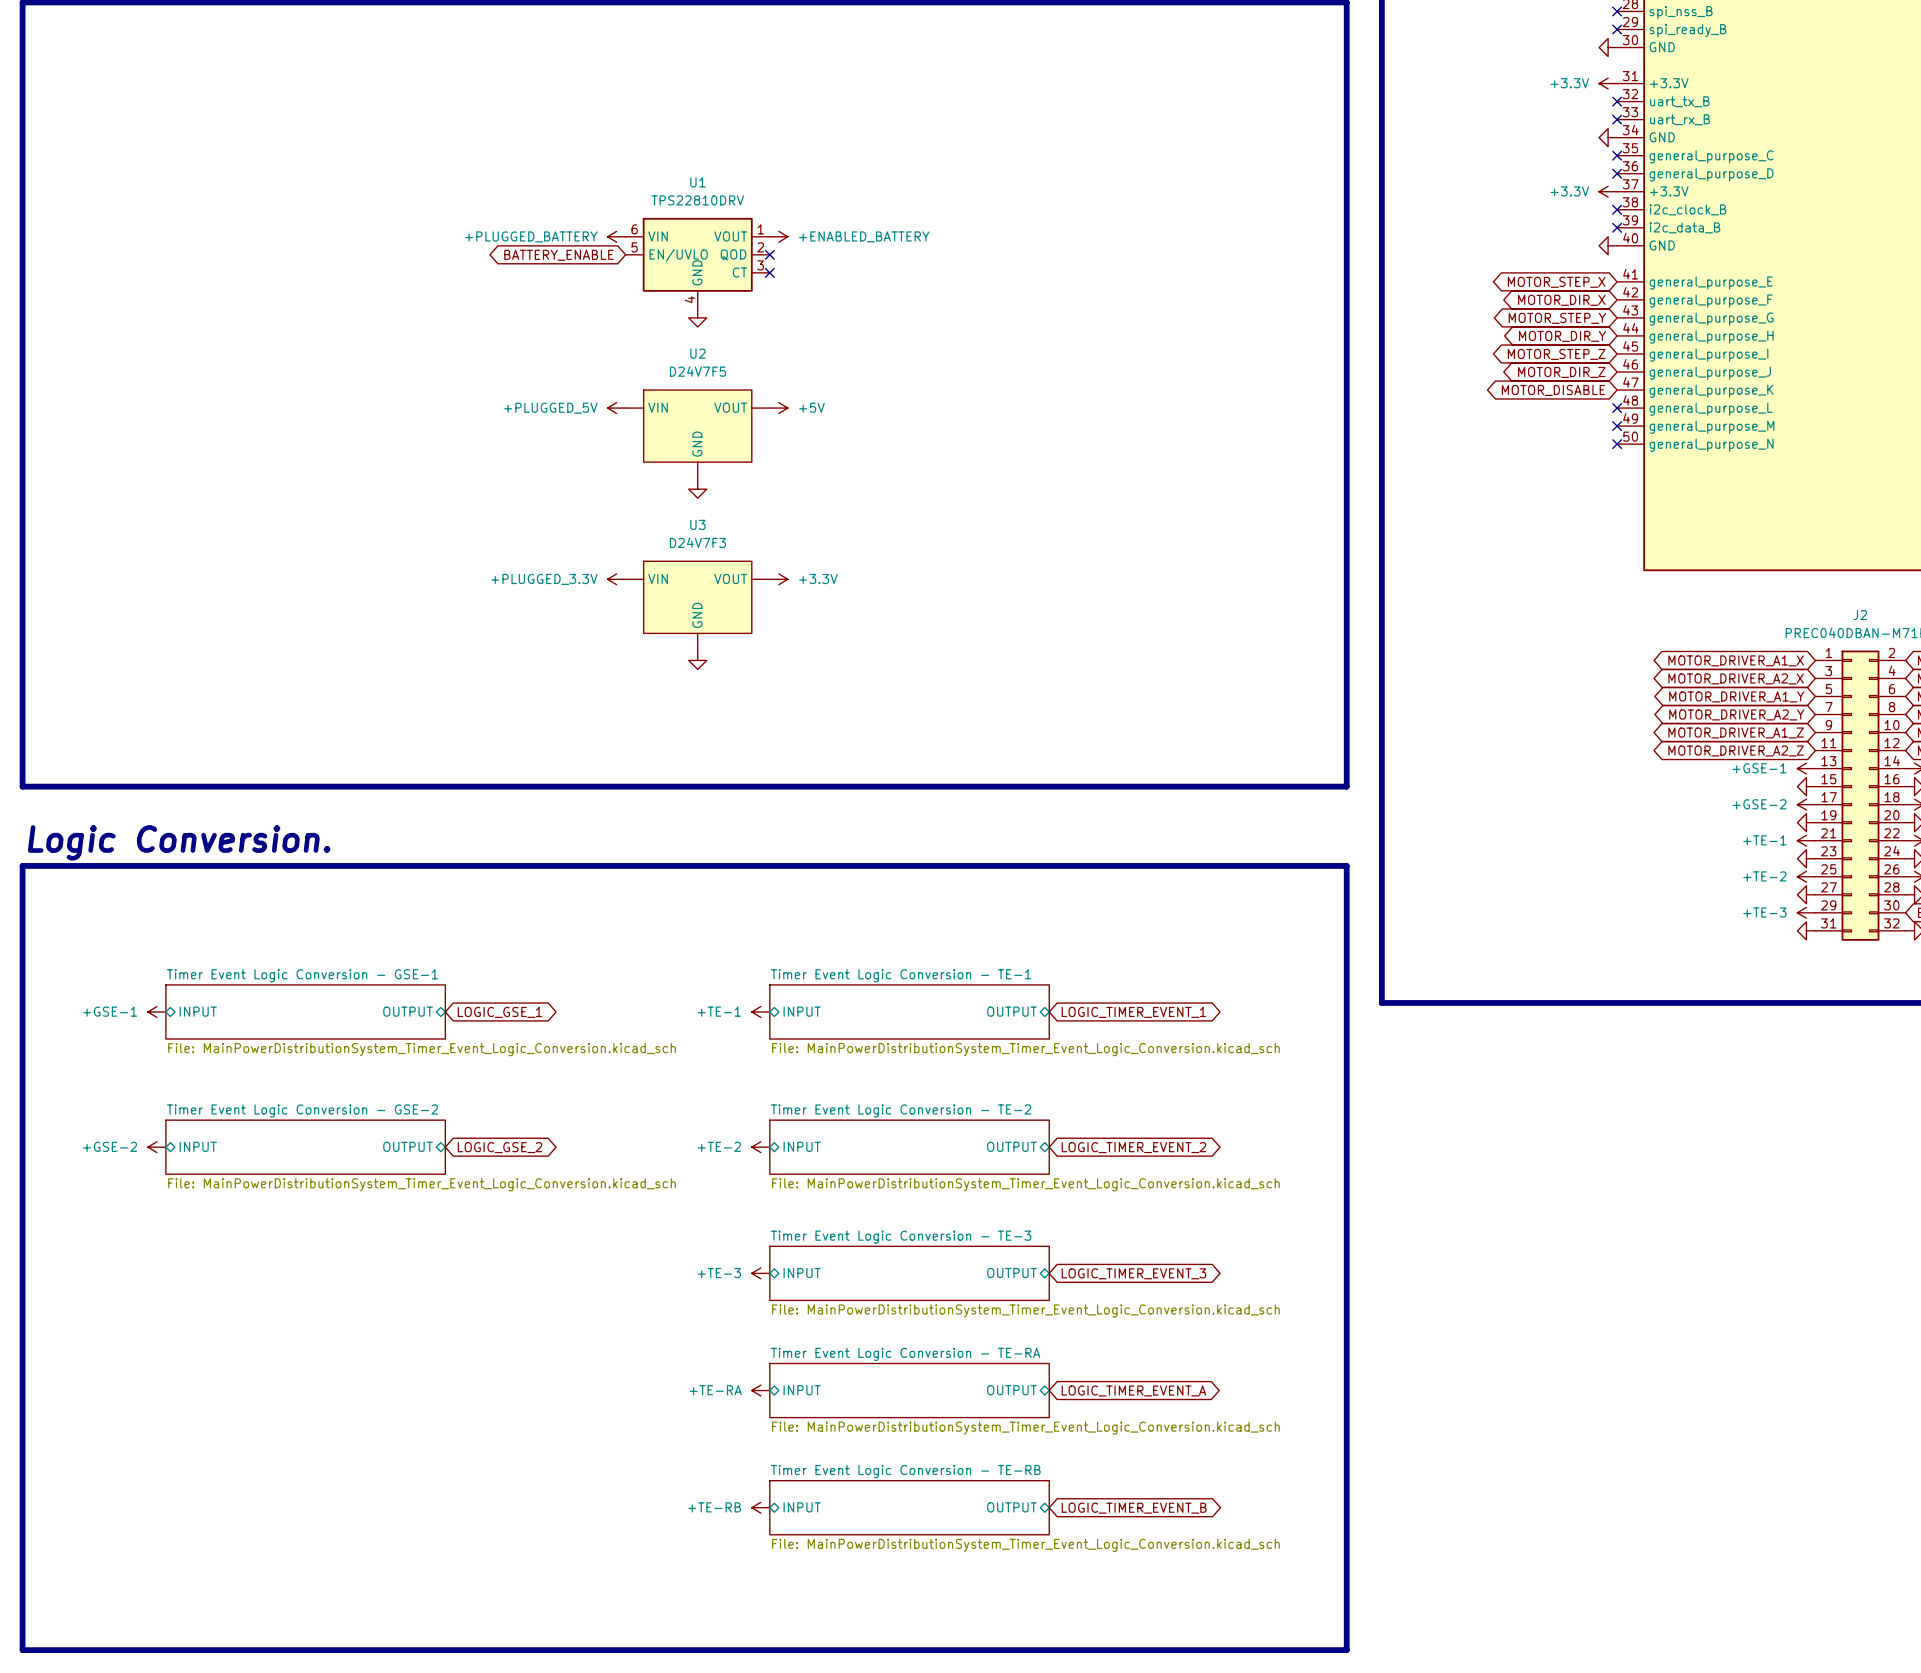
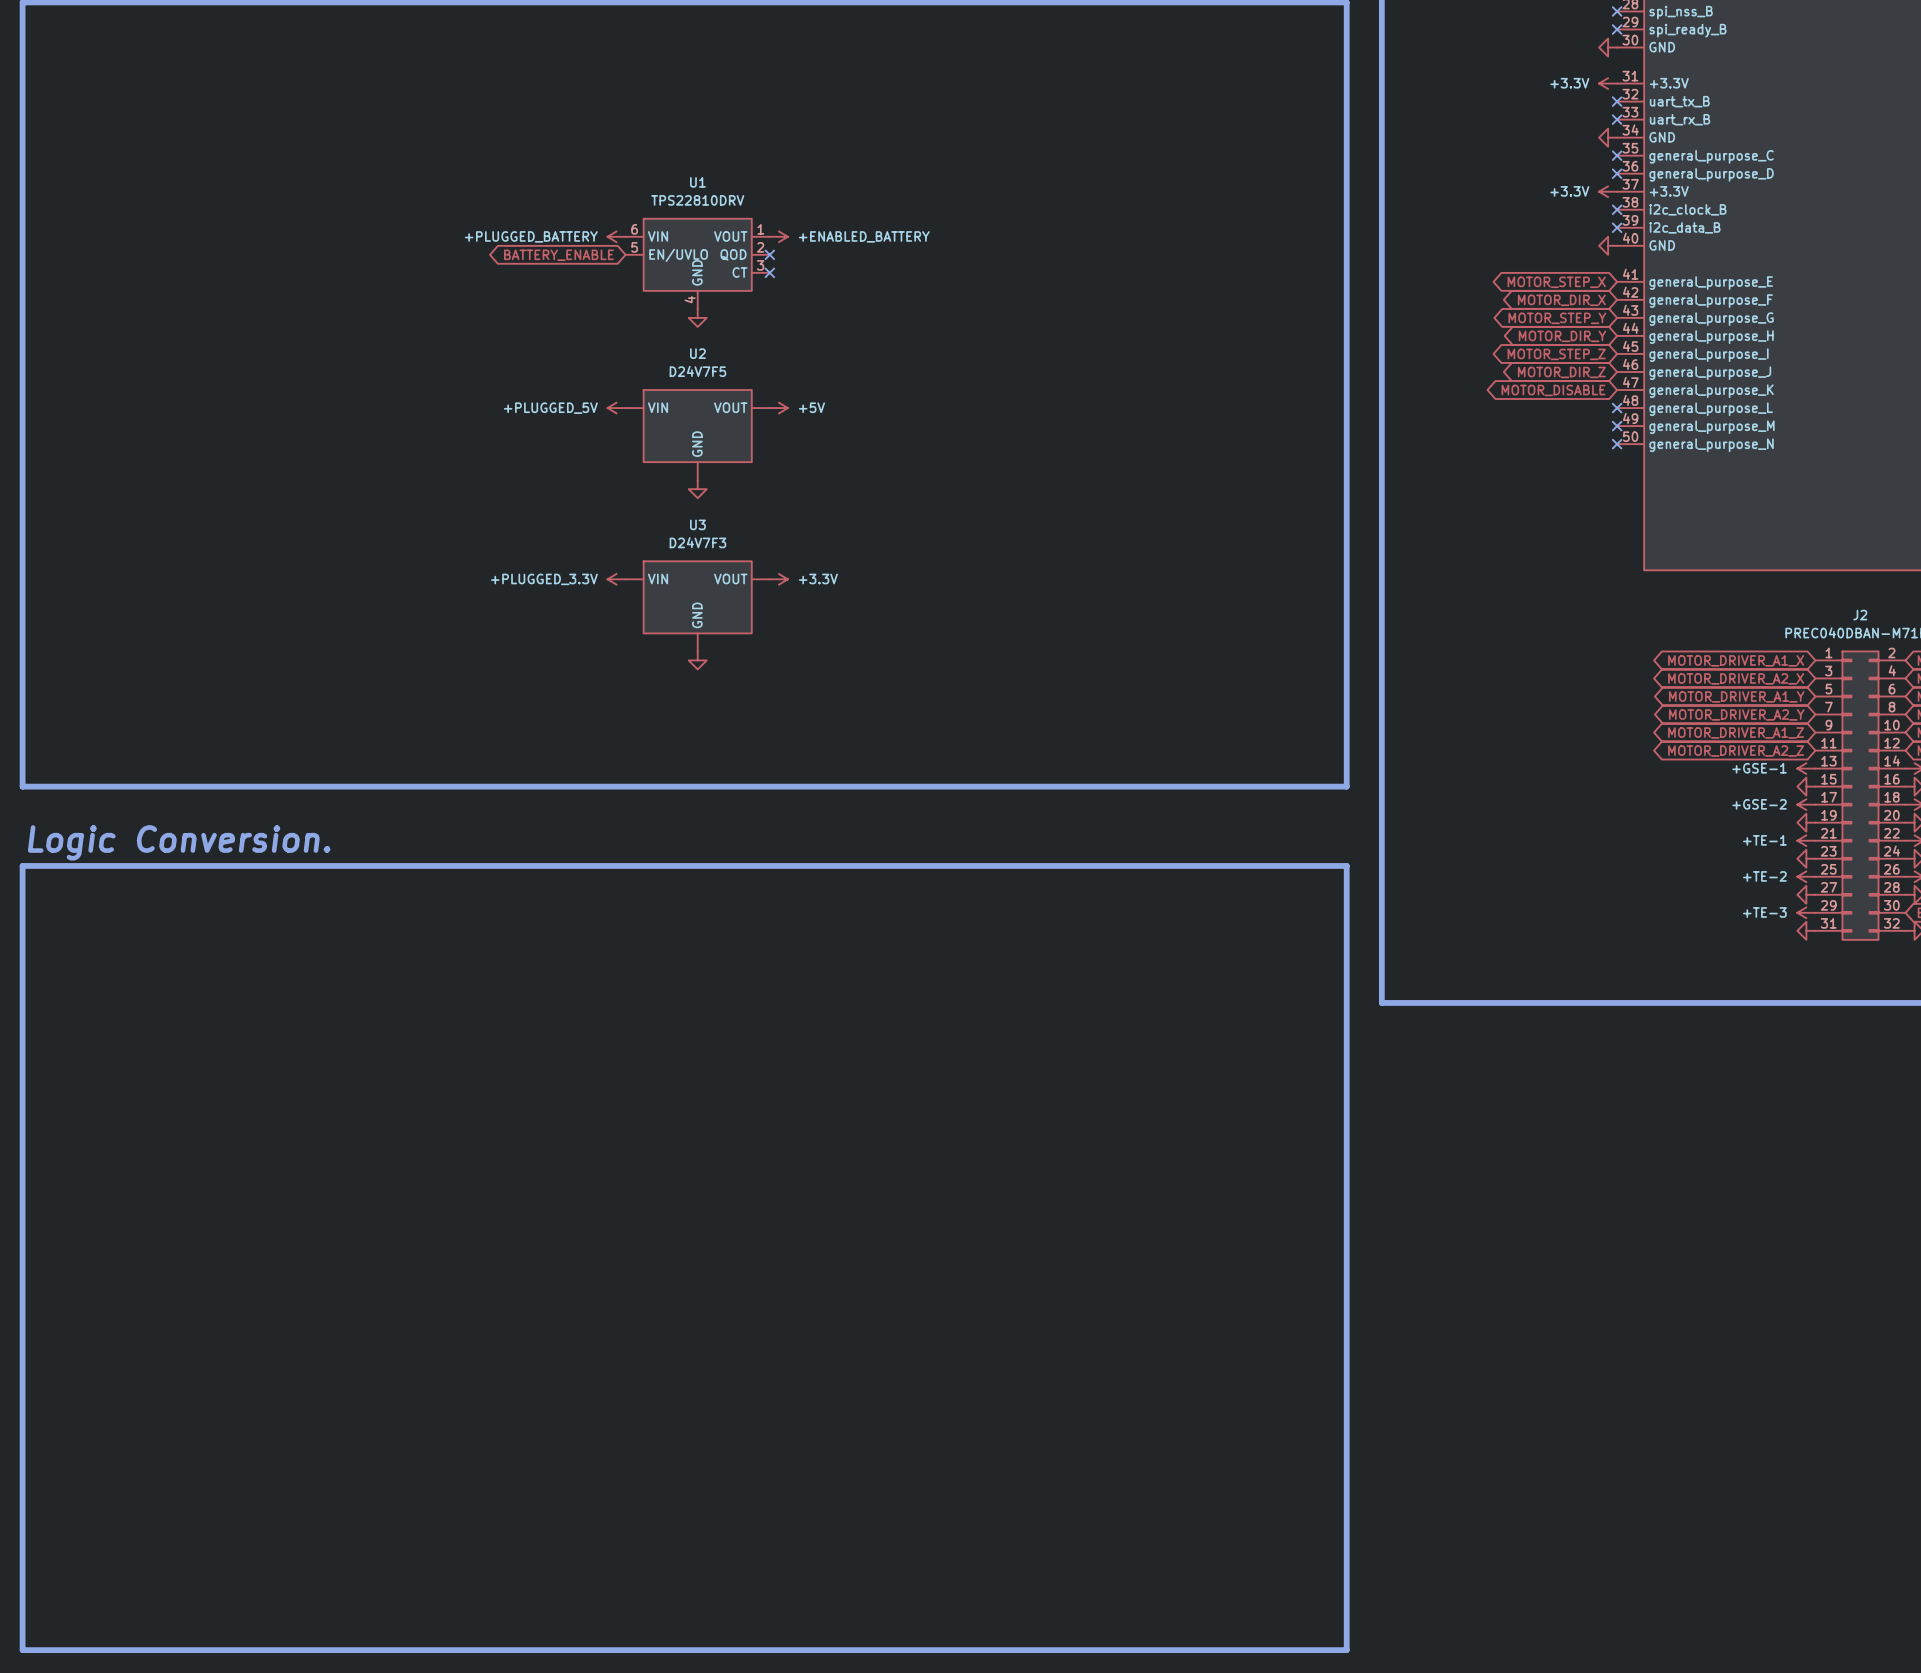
power symbol: +GSE-1 (156, 1011) -> none
sheet pin: INPUT (198, 1011) -> none
sheet Timer Event Logic Conversion - GSE-1: File: MainPowerDistributionSystem_Timer_Event_Logic_Conversion.kicad_sch (305, 1011) -> none
sheet pin: OUTPUT (408, 1011) -> none
power symbol: +TE-1 (760, 1011) -> none
sheet pin: INPUT (802, 1011) -> none
sheet Timer Event Logic Conversion - TE-1: File: MainPowerDistributionSystem_Timer_Event_Logic_Conversion.kicad_sch (909, 1011) -> none
sheet pin: OUTPUT (1011, 1011) -> none
global label: LOGIC_GSE_1 (499, 1012) -> none
global label: LOGIC_TIMER_EVENT_1 (1133, 1012) -> none
sheet pin: INPUT (198, 1146) -> none
sheet pin: OUTPUT (408, 1146) -> none
sheet pin: INPUT (802, 1146) -> none
sheet pin: OUTPUT (1011, 1146) -> none
power symbol: +GSE-2 (156, 1147) -> none
sheet Timer Event Logic Conversion - GSE-2: File: MainPowerDistributionSystem_Timer_Event_Logic_Conversion.kicad_sch (305, 1147) -> none
global label: LOGIC_GSE_2 (499, 1147) -> none
power symbol: +TE-2 (760, 1147) -> none
sheet Timer Event Logic Conversion - TE-2: File: MainPowerDistributionSystem_Timer_Event_Logic_Conversion.kicad_sch (909, 1147) -> none
global label: LOGIC_TIMER_EVENT_2 (1133, 1147) -> none
power symbol: +TE-3 (760, 1273) -> none
sheet pin: INPUT (802, 1273) -> none
sheet Timer Event Logic Conversion - TE-3: File: MainPowerDistributionSystem_Timer_Event_Logic_Conversion.kicad_sch (909, 1273) -> none
sheet pin: OUTPUT (1011, 1273) -> none
global label: LOGIC_TIMER_EVENT_3 (1133, 1273) -> none
power symbol: +TE-RA (760, 1390) -> none
sheet pin: INPUT (802, 1390) -> none
sheet Timer Event Logic Conversion - TE-RA: File: MainPowerDistributionSystem_Timer_Event_Logic_Conversion.kicad_sch (909, 1390) -> none
sheet pin: OUTPUT (1011, 1390) -> none
global label: LOGIC_TIMER_EVENT_A (1133, 1390) -> none
power symbol: +TE-RB (760, 1507) -> none
sheet pin: INPUT (802, 1507) -> none
sheet Timer Event Logic Conversion - TE-RB: File: MainPowerDistributionSystem_Timer_Event_Logic_Conversion.kicad_sch (909, 1507) -> none
sheet pin: OUTPUT (1011, 1507) -> none
global label: LOGIC_TIMER_EVENT_B (1134, 1508) -> none

